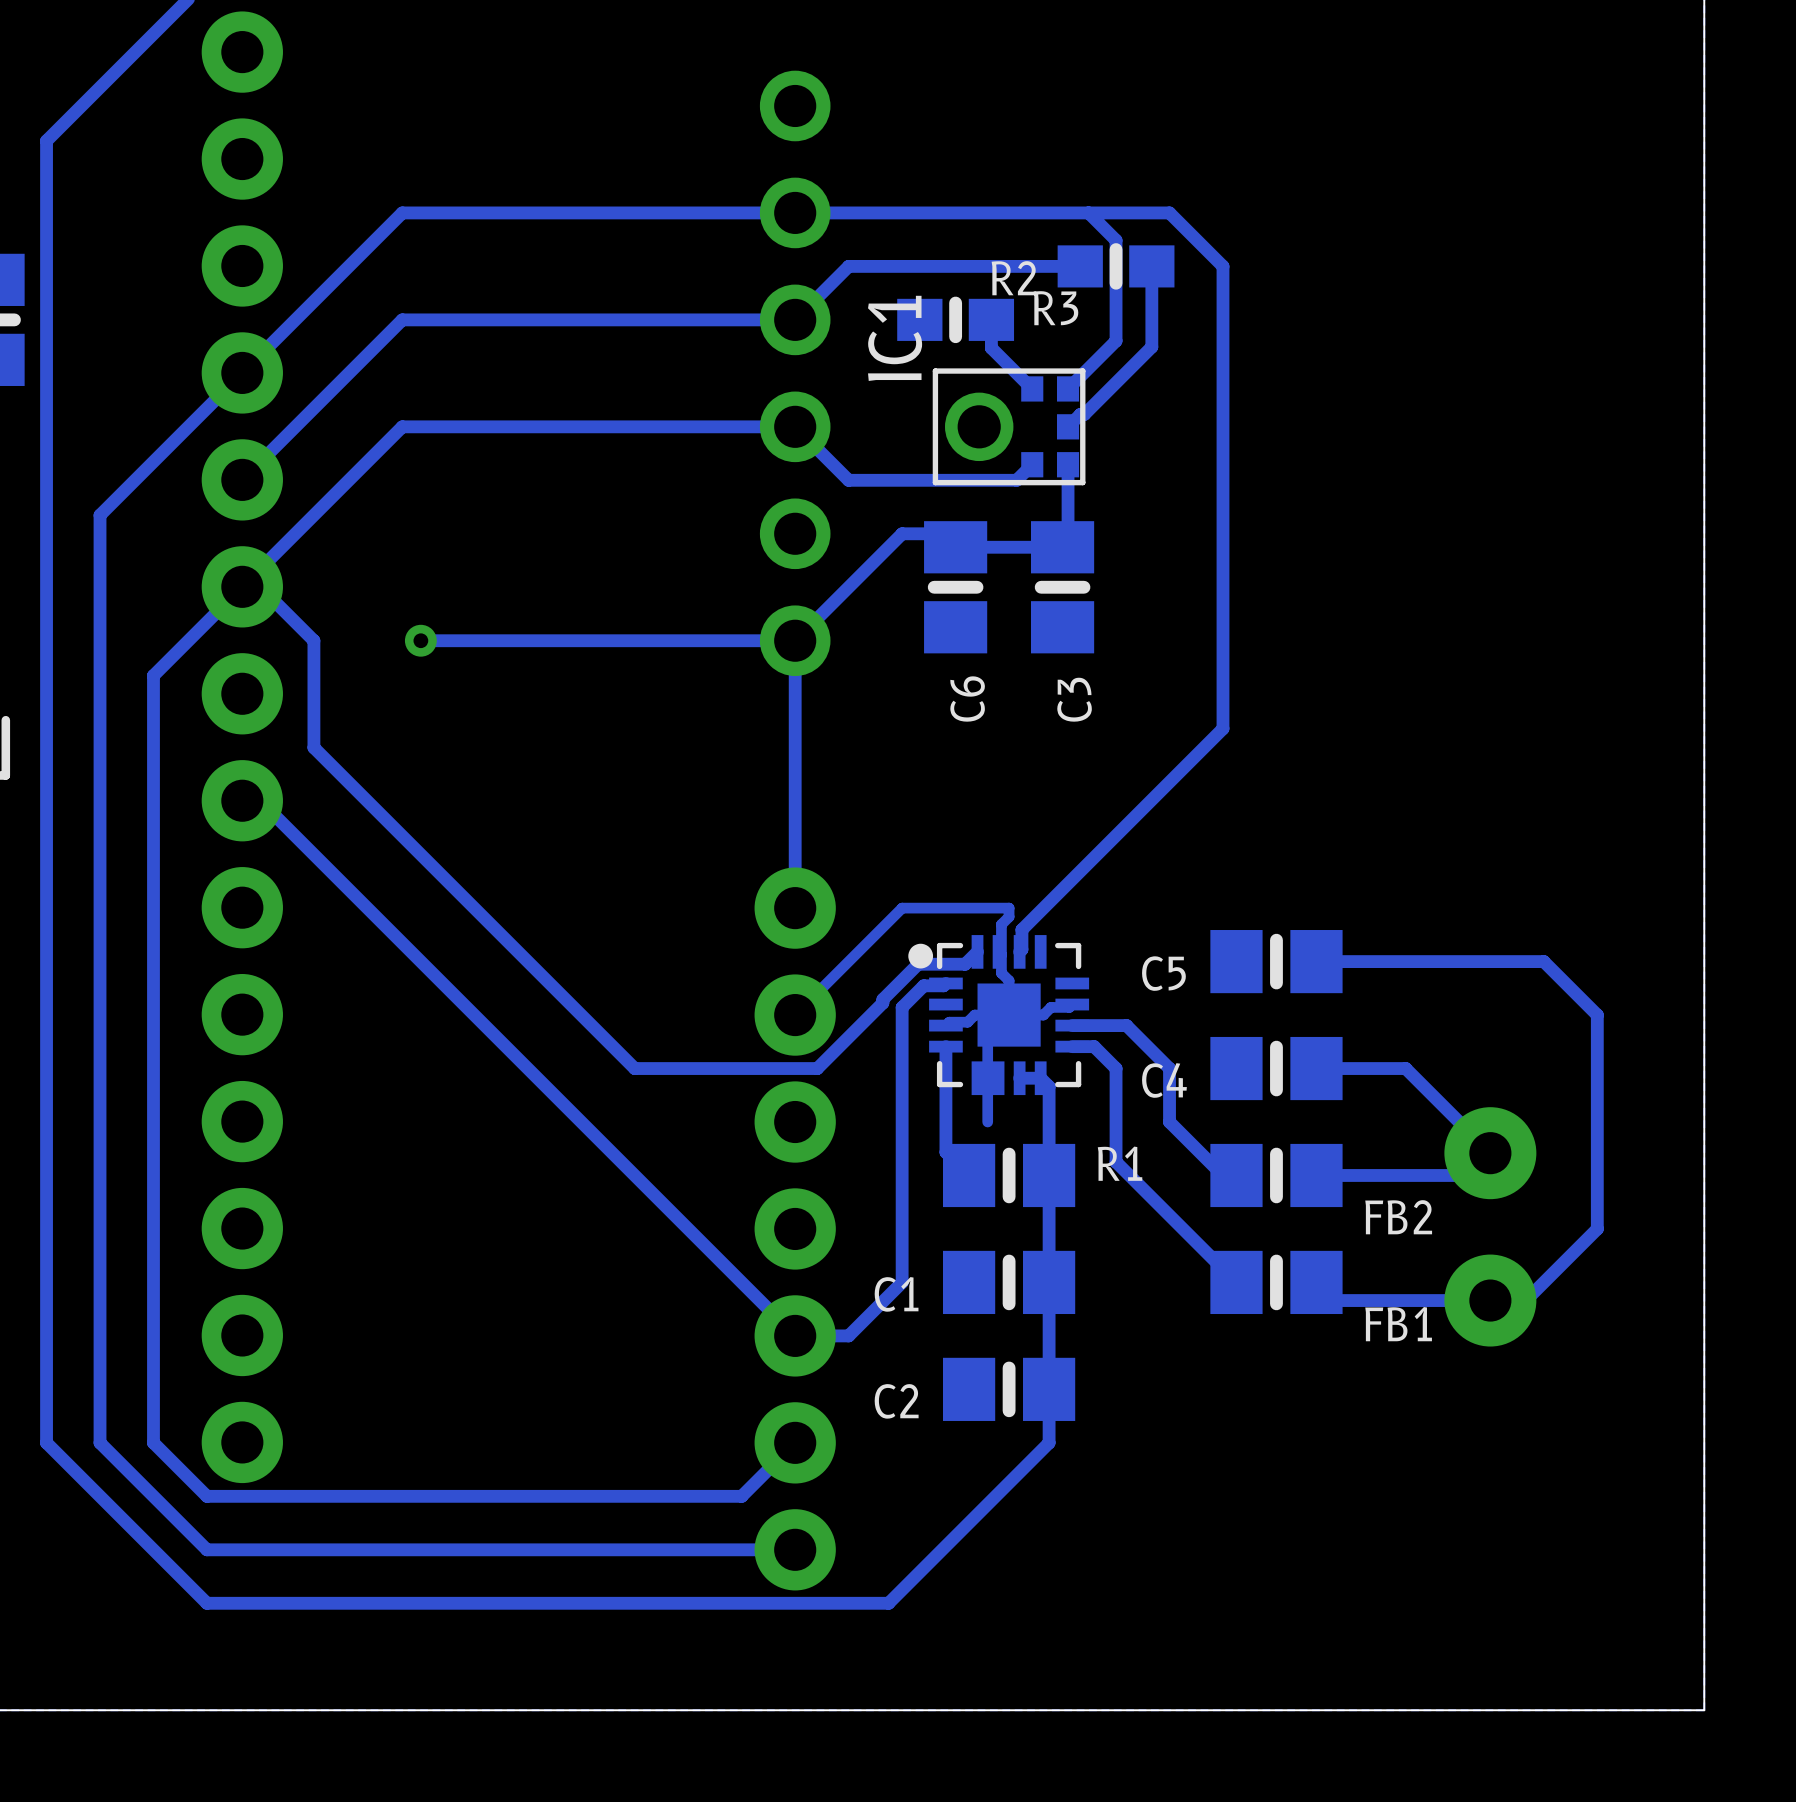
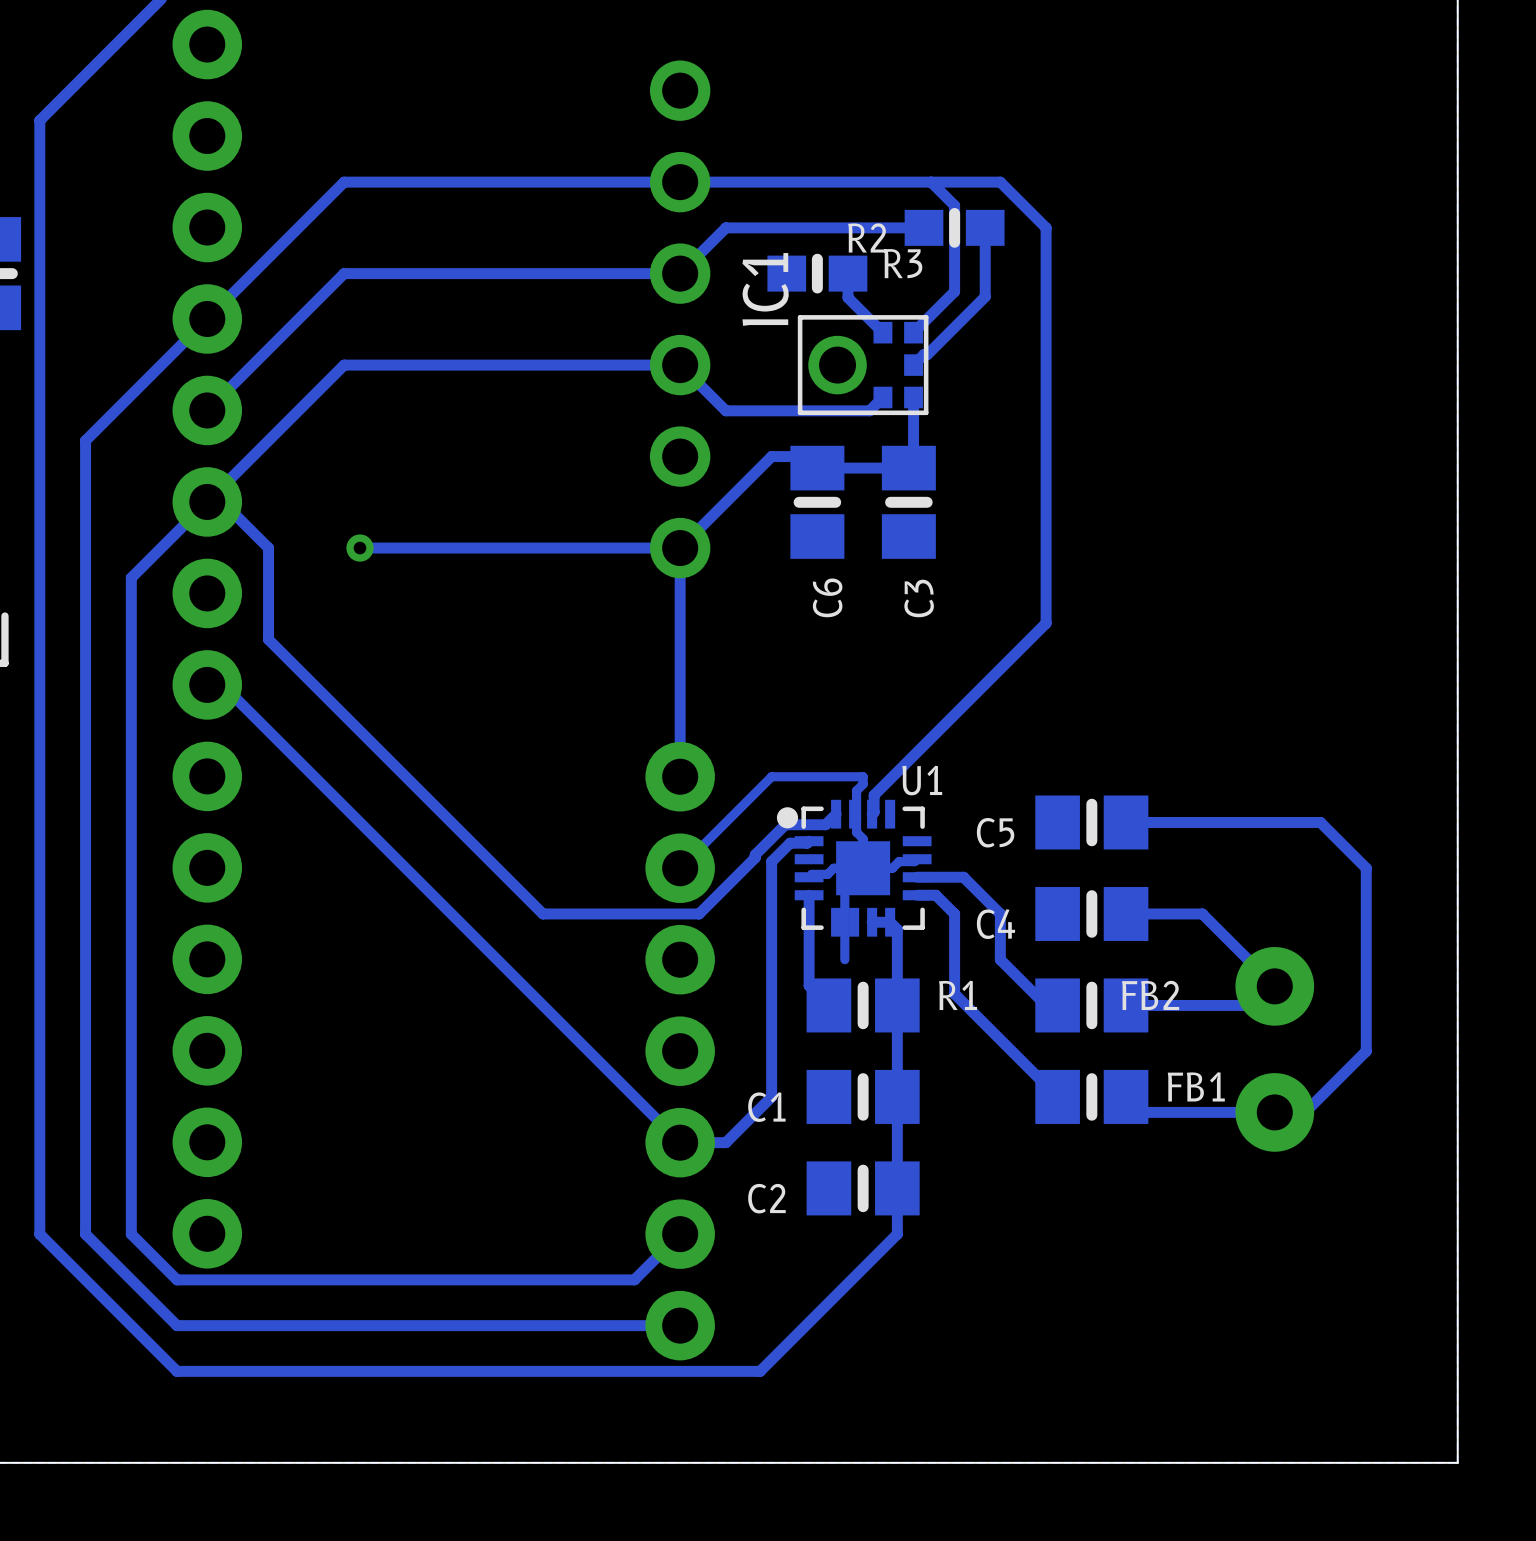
U1 name: none -> U1 (922, 780)
FB2 name position: FB2 (1398, 1217) -> FB2 (1150, 995)
FB1 name position: FB1 (1398, 1324) -> FB1 (1196, 1086)

